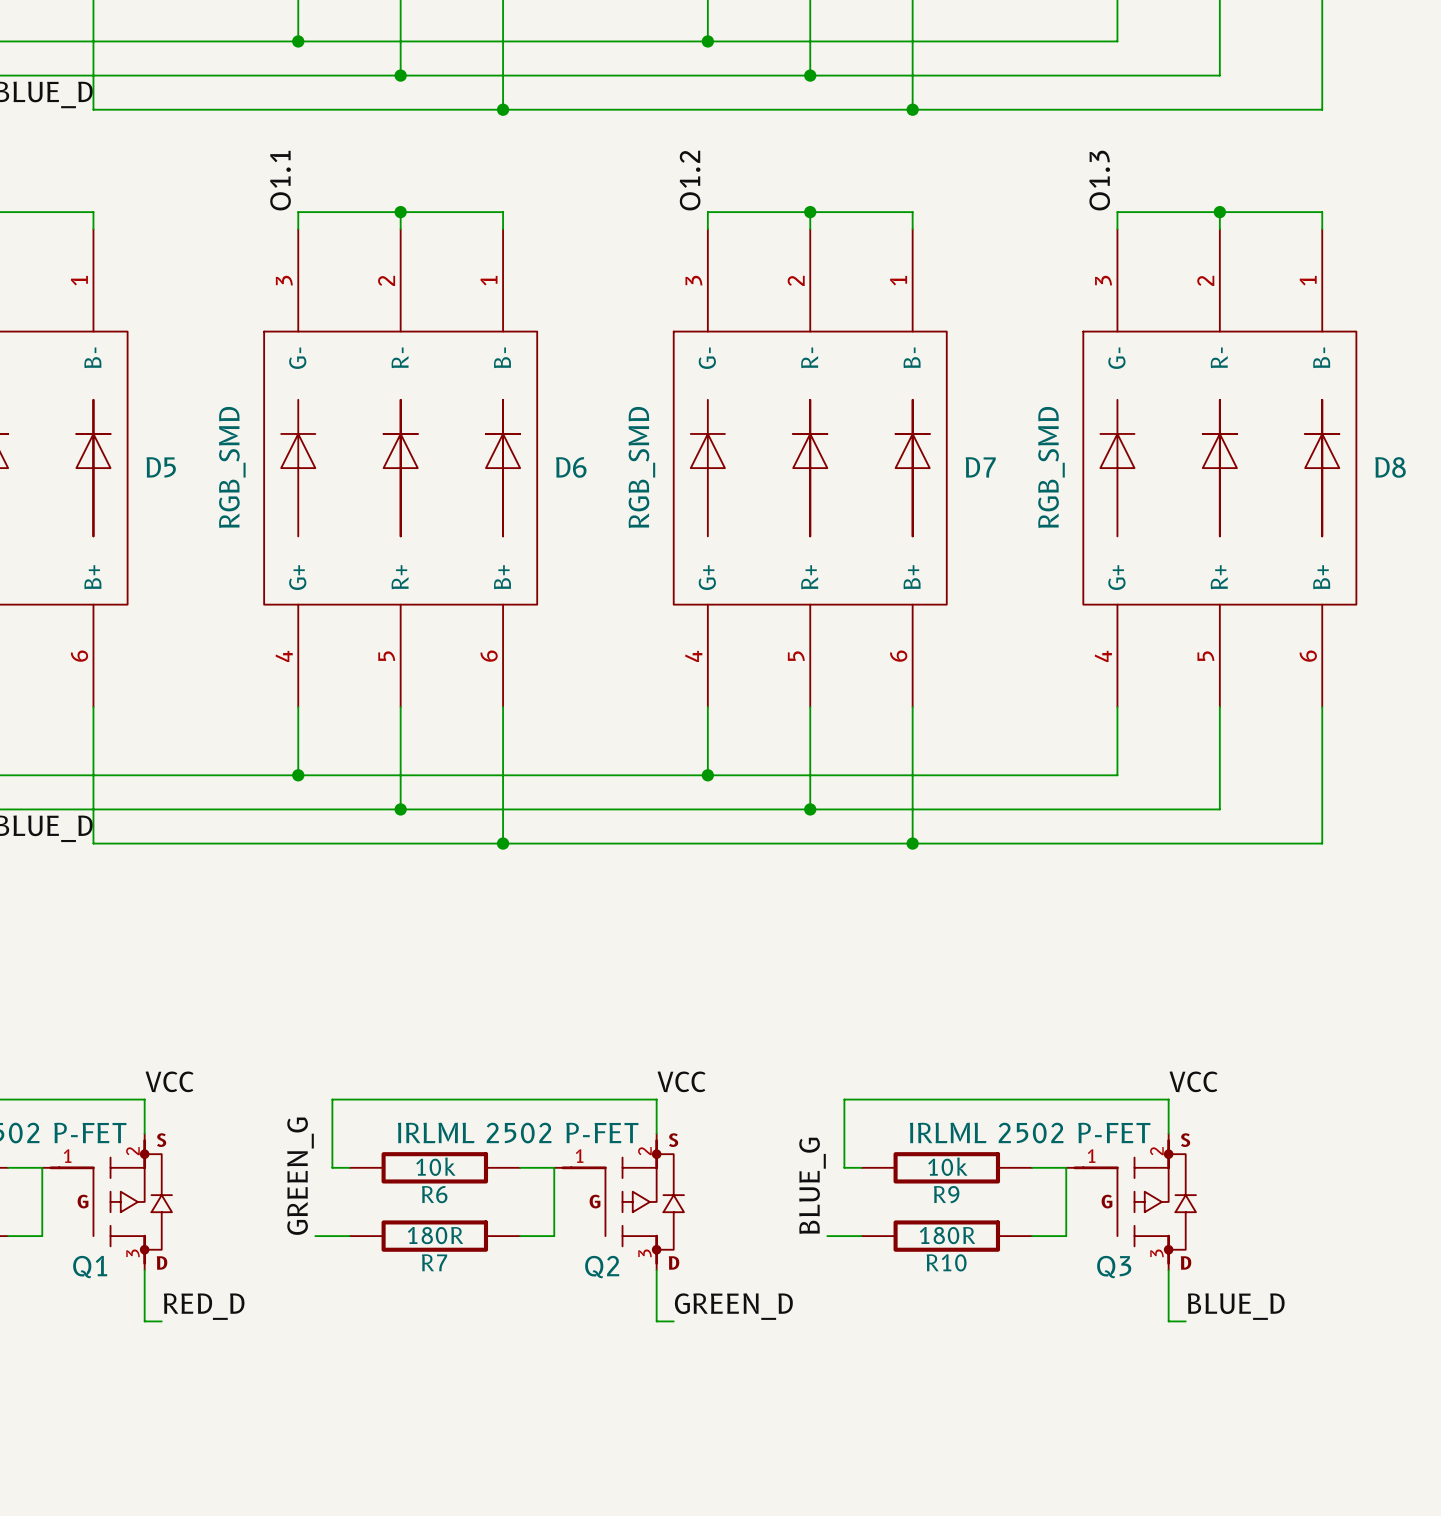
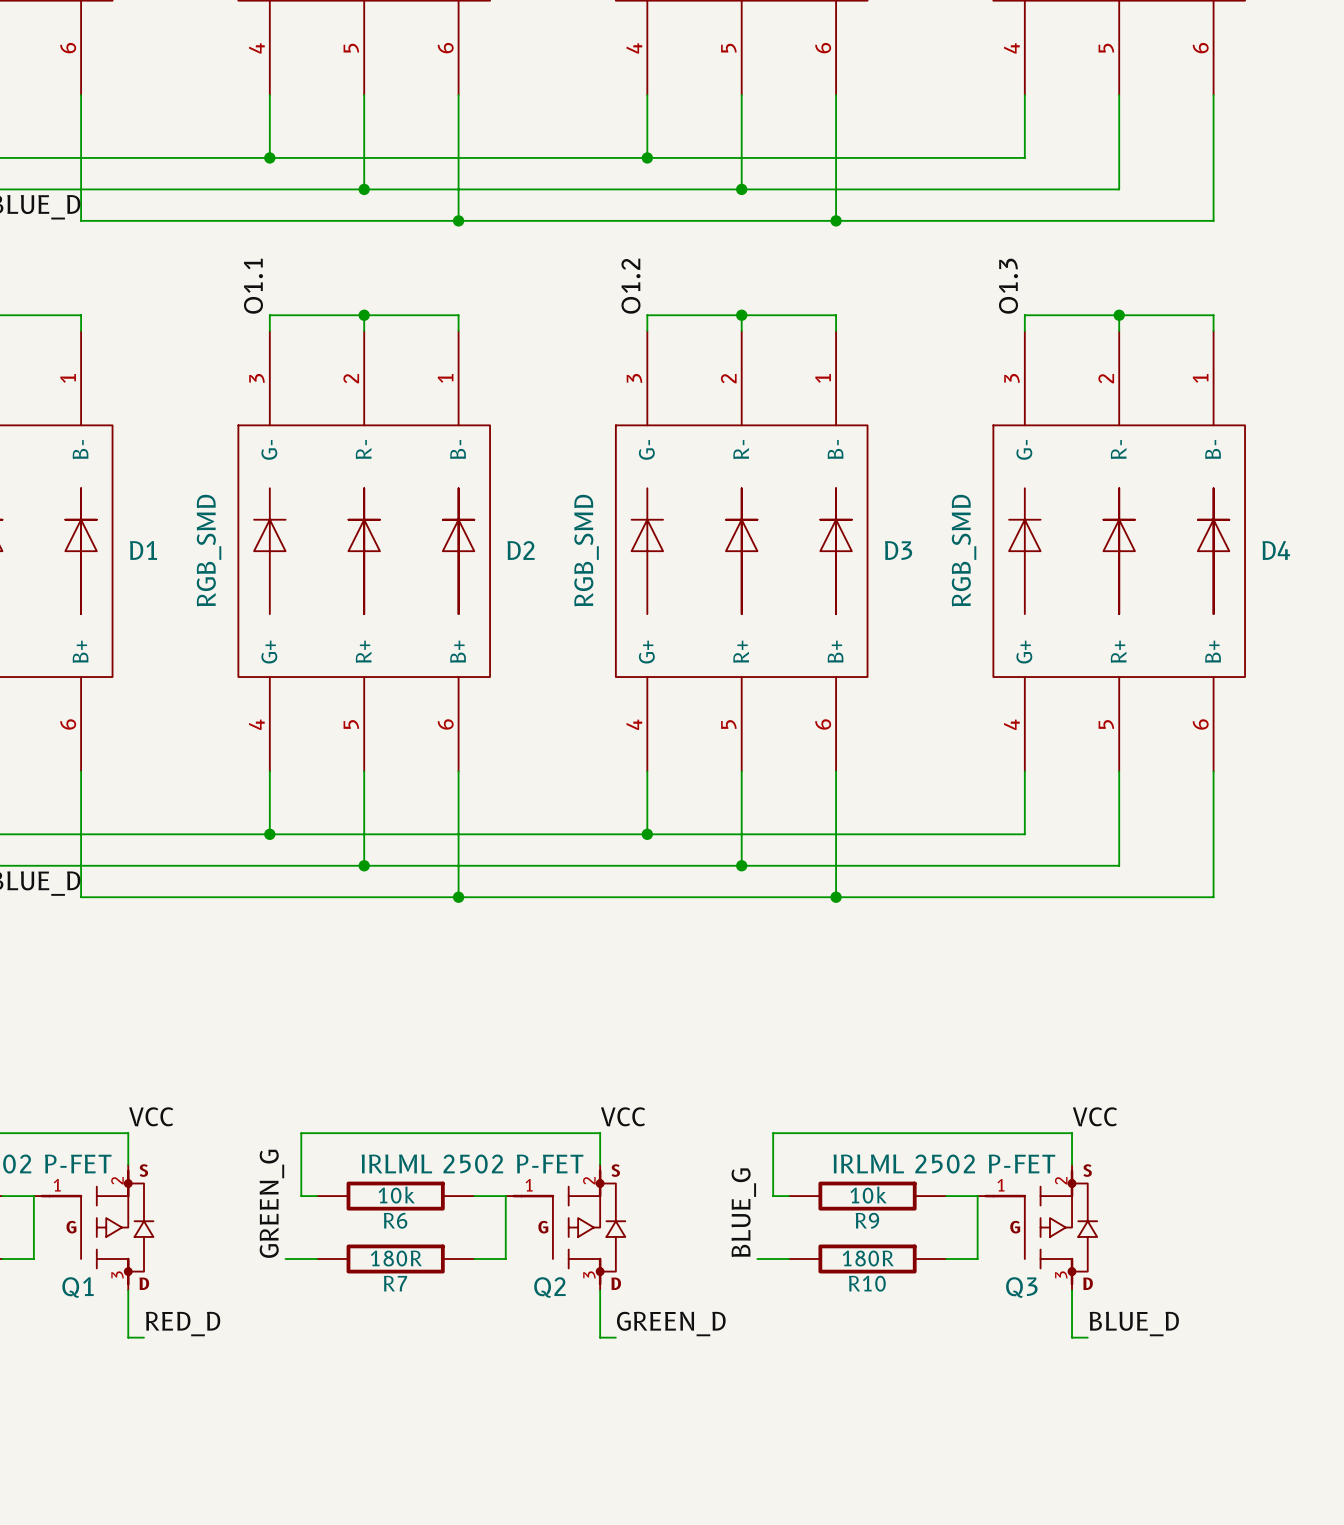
D5 name: D5 (161, 467) -> D1 (143, 550)
D6 name: D6 (571, 467) -> D2 (521, 550)
D7 name: D7 (980, 467) -> D3 (898, 550)
D8 name: D8 (1390, 467) -> D4 (1276, 550)

